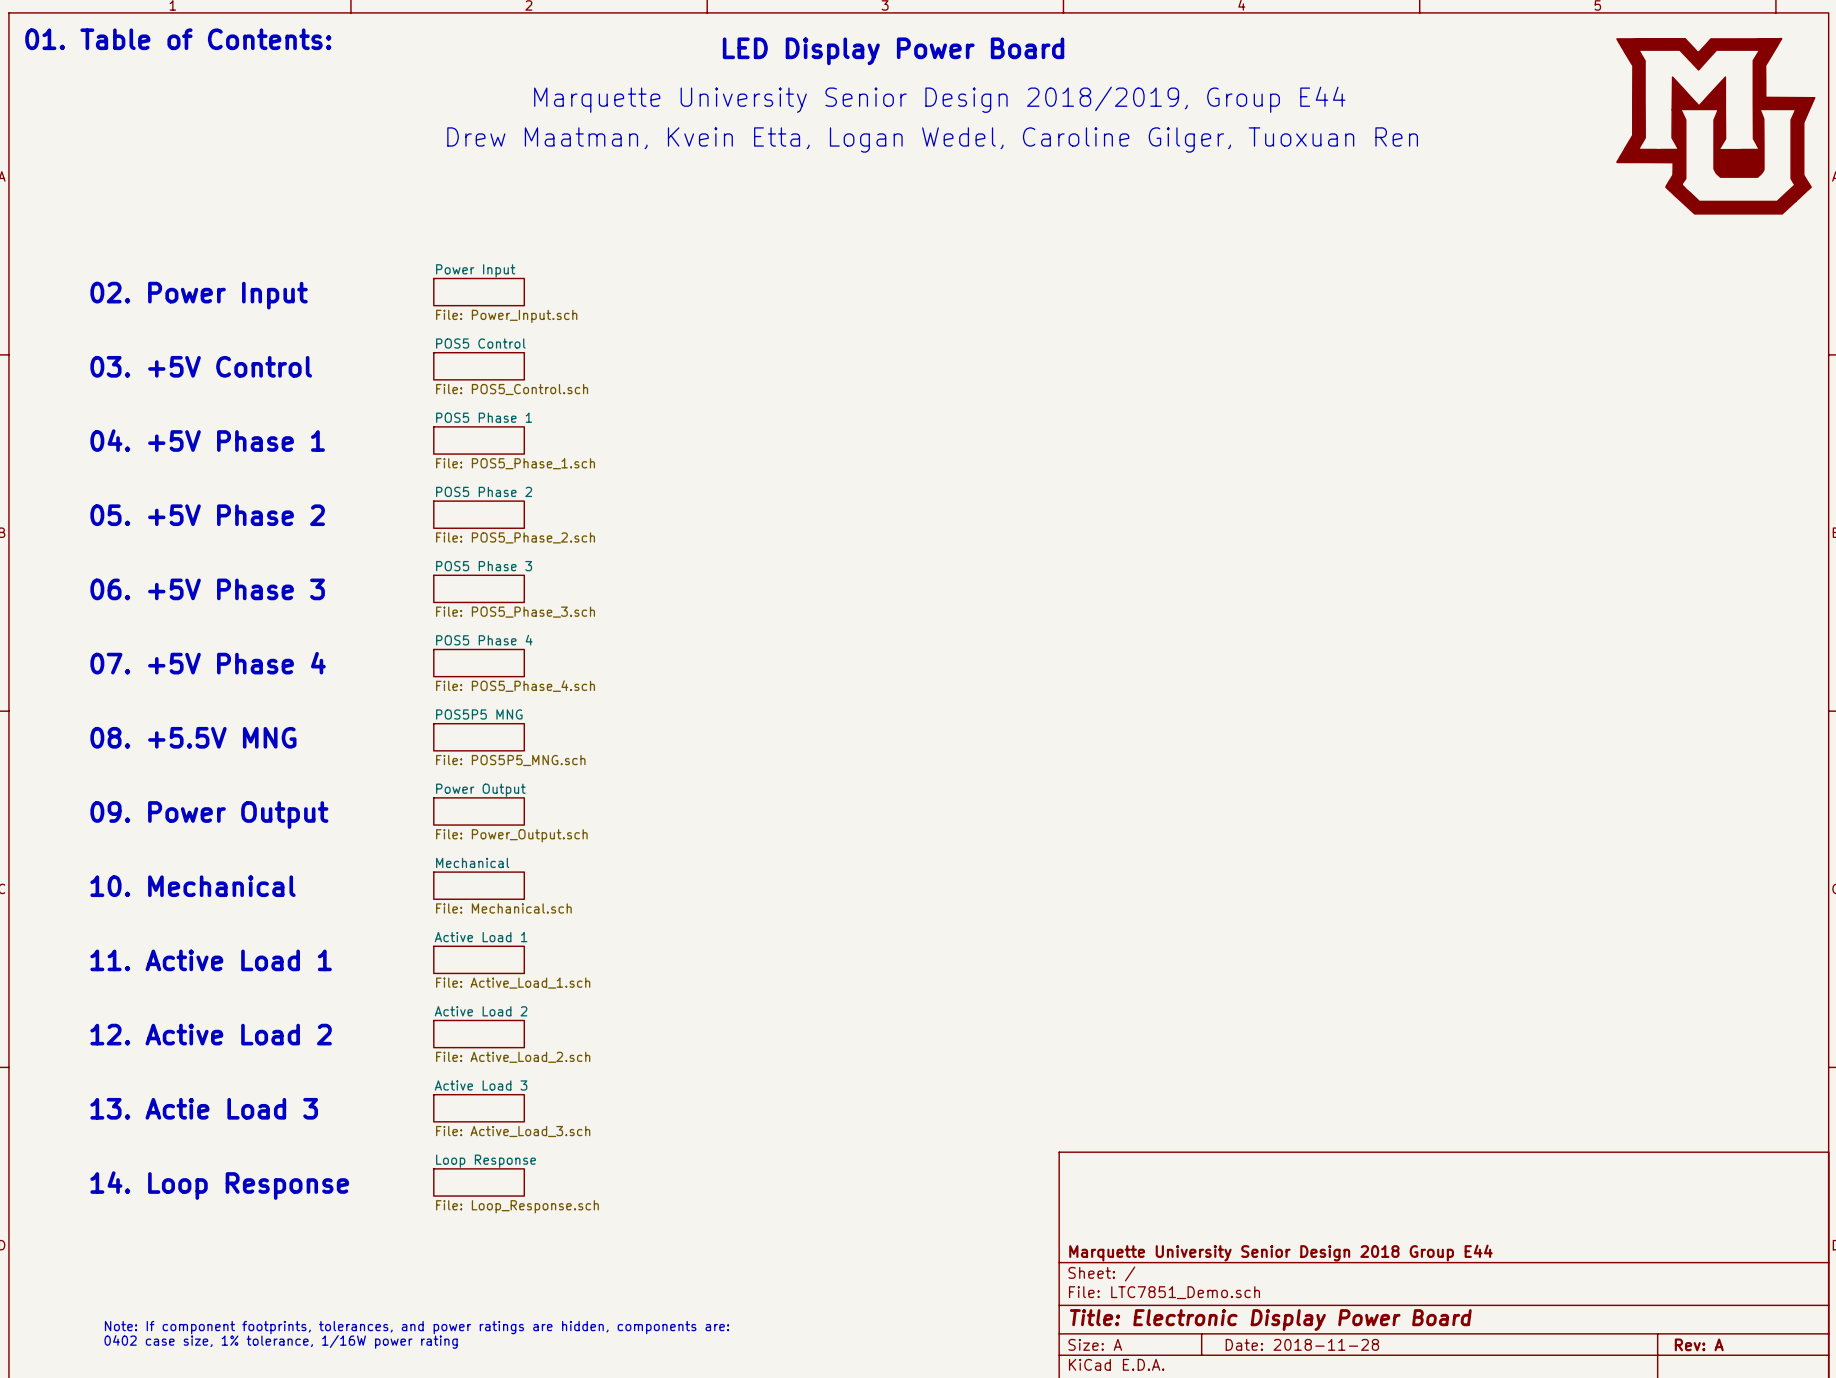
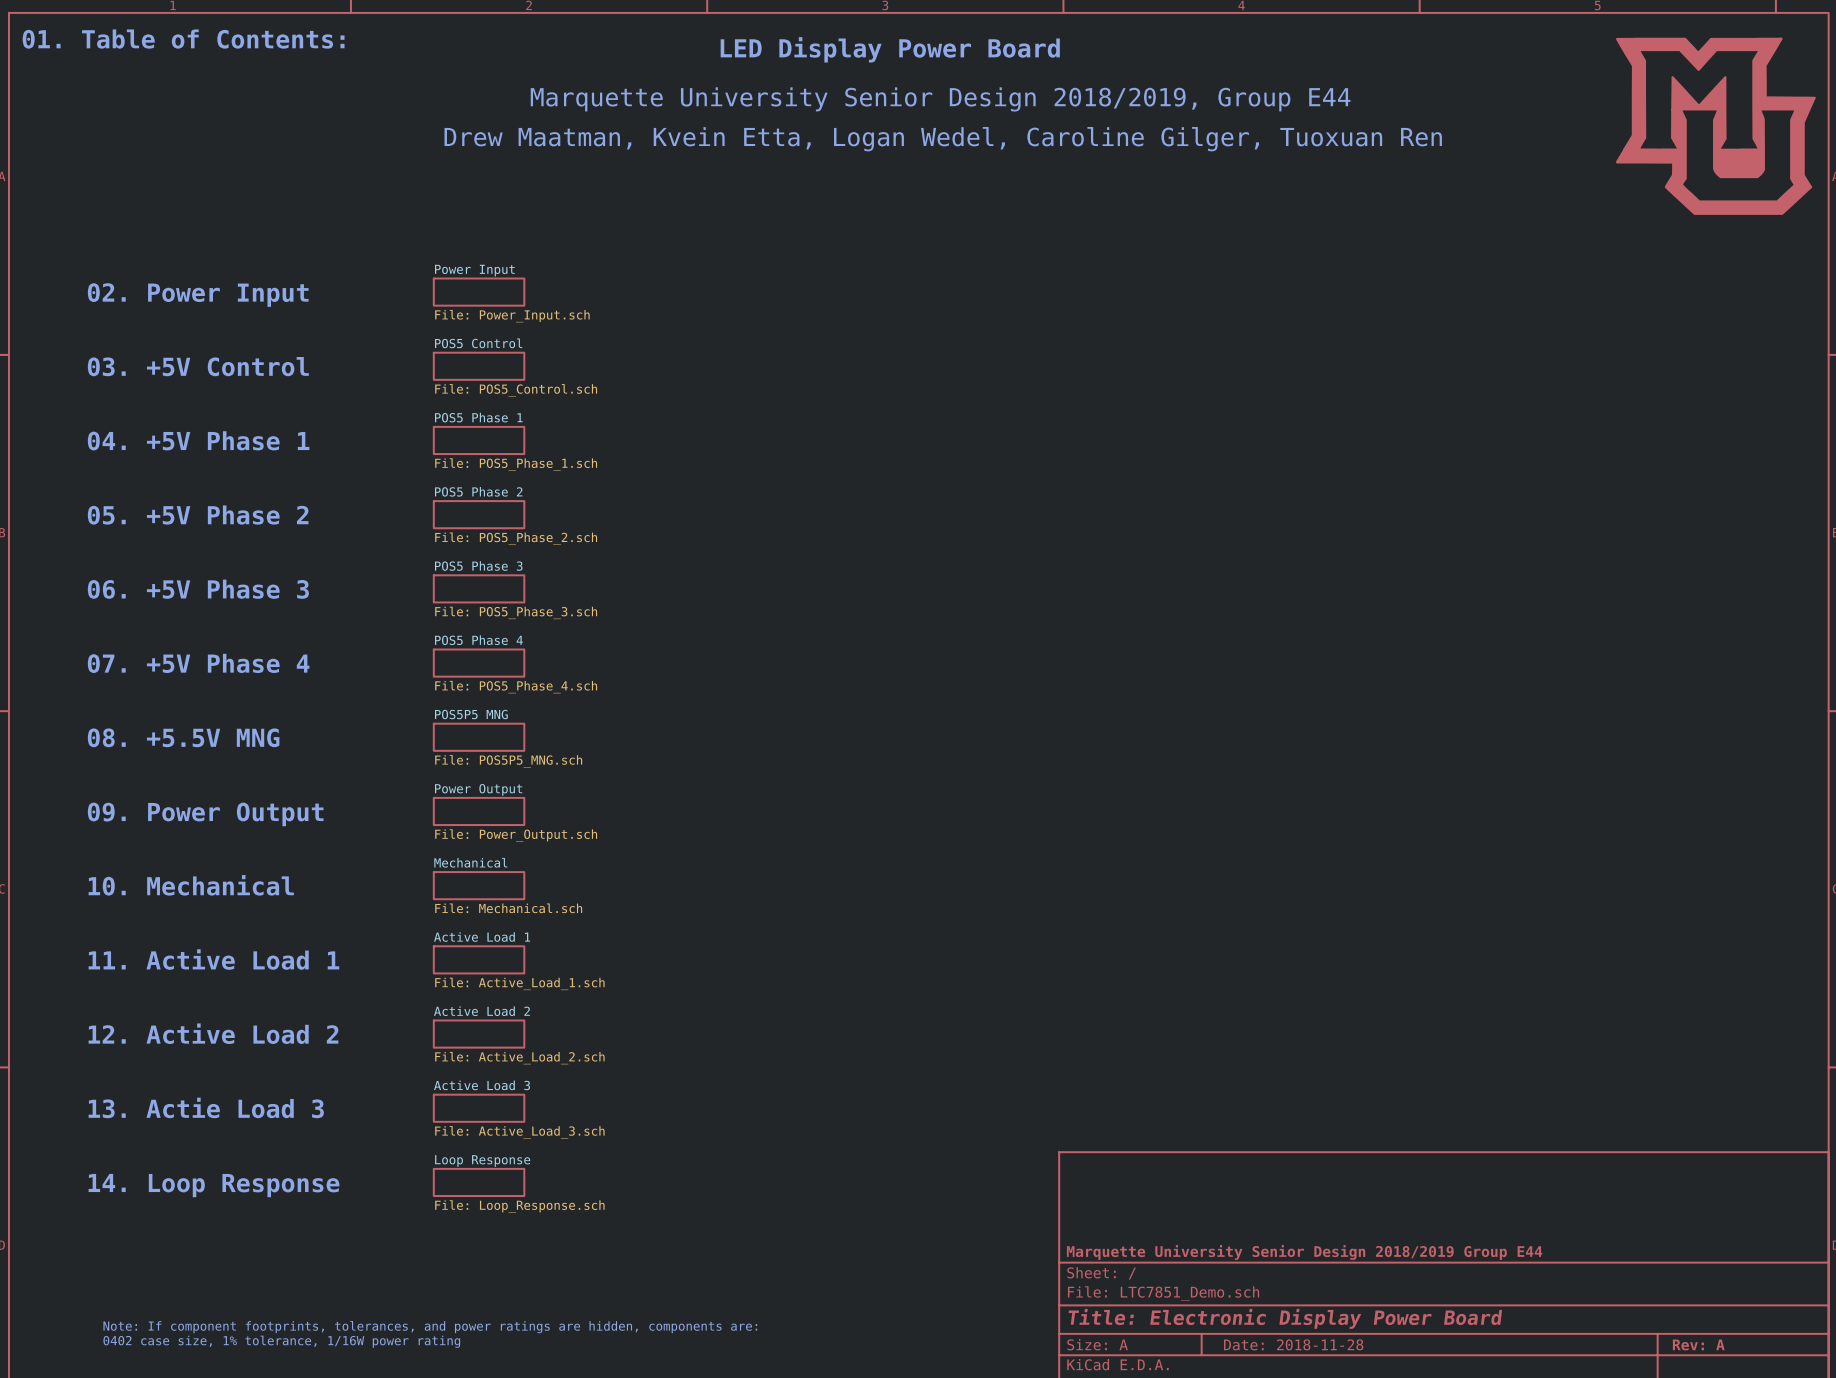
title block: Marquette University Senior Design 2018 Group E44 (1280, 1253) -> Marquette University Senior Design 2018/2019 Group E44 (1304, 1252)

